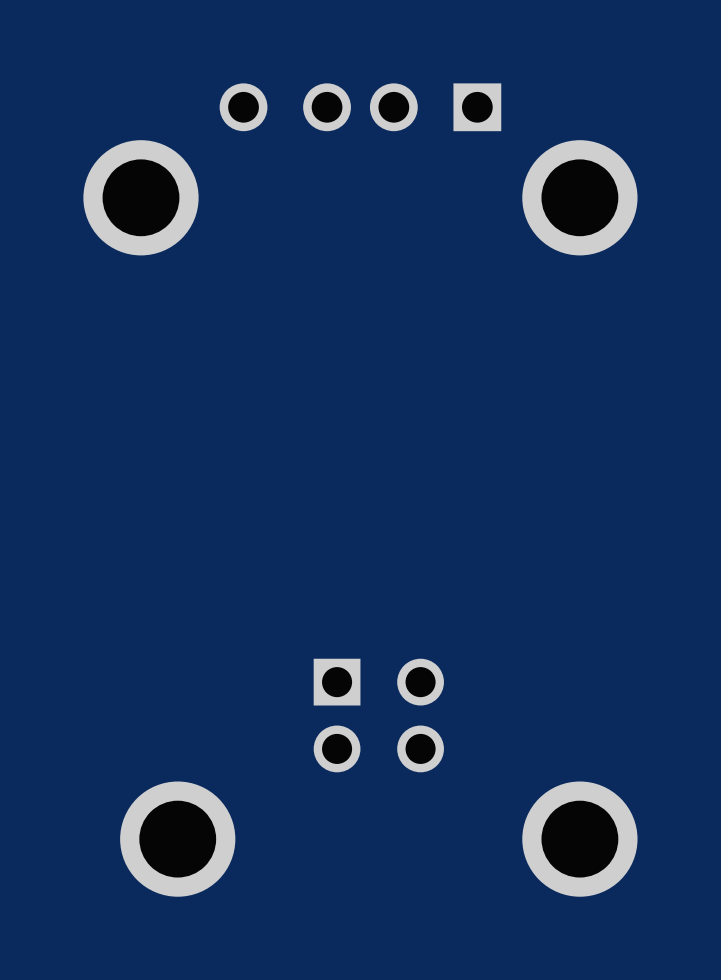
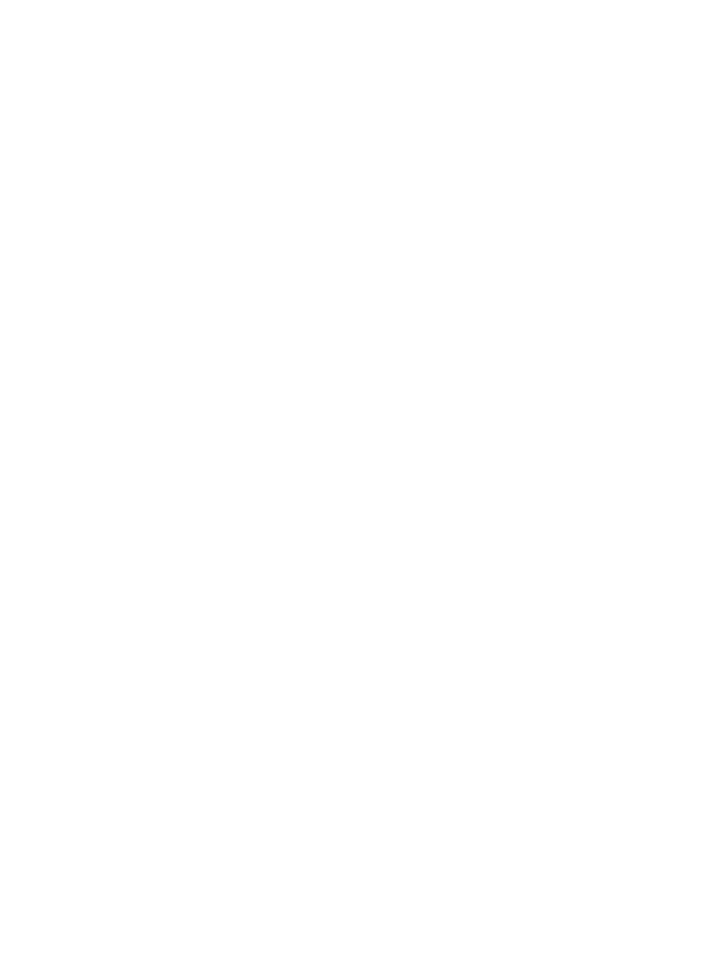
part: (360, 169) -> none
part: (378, 777) -> none

